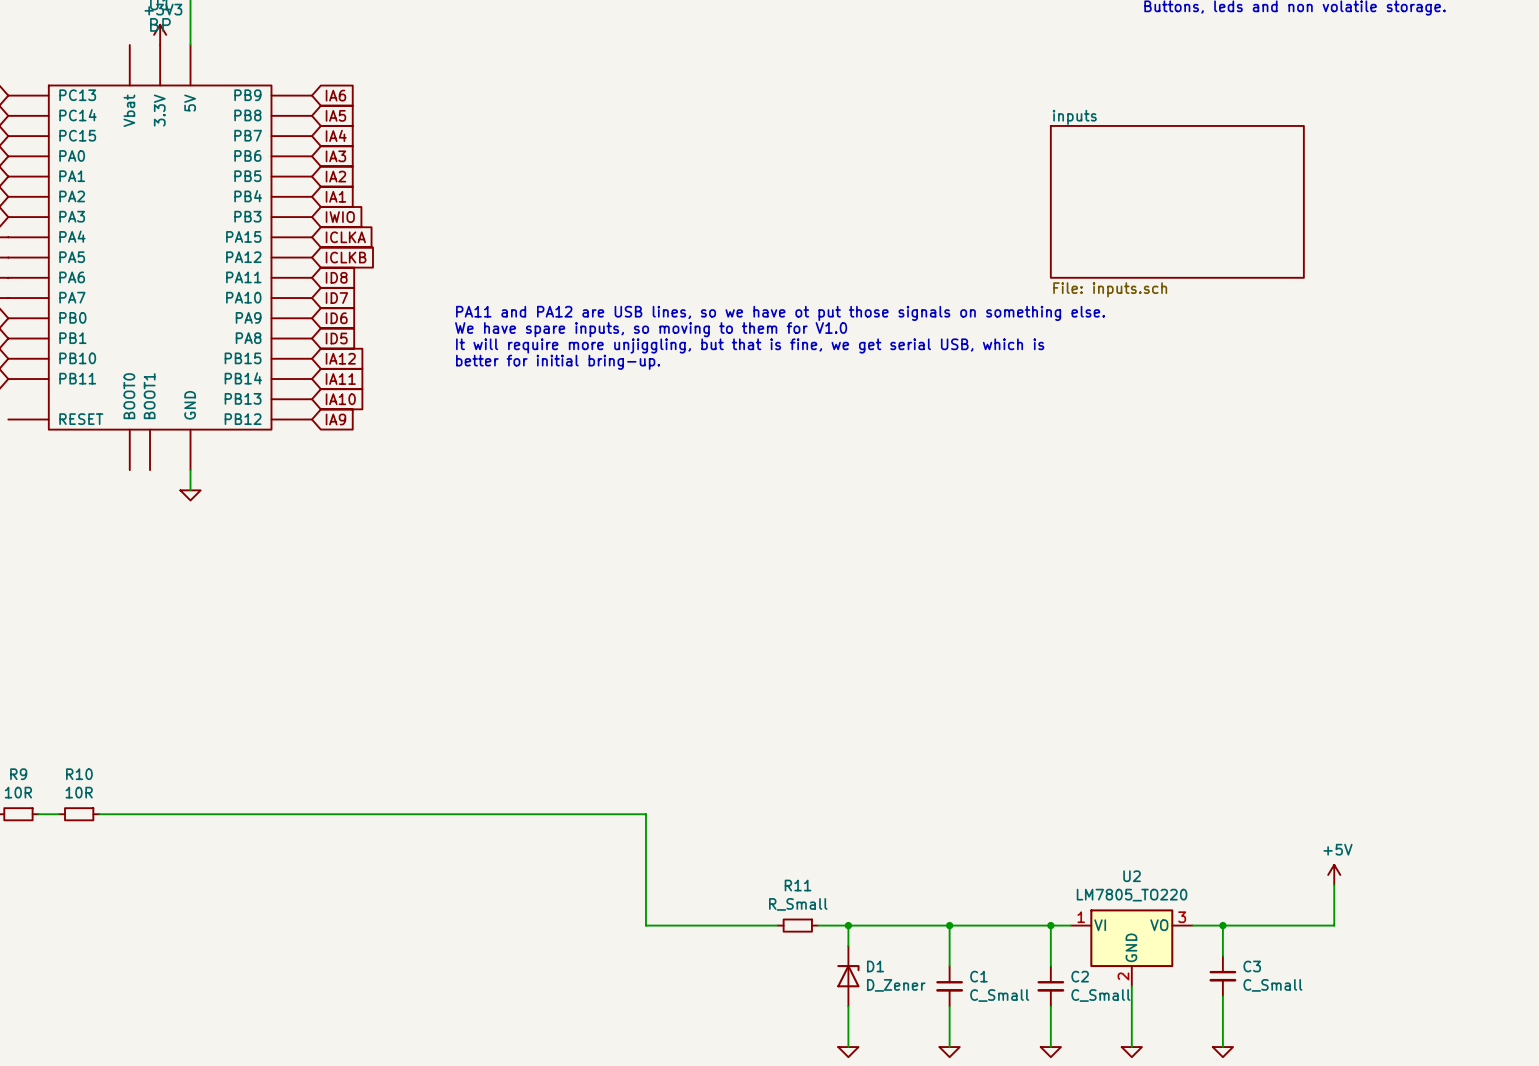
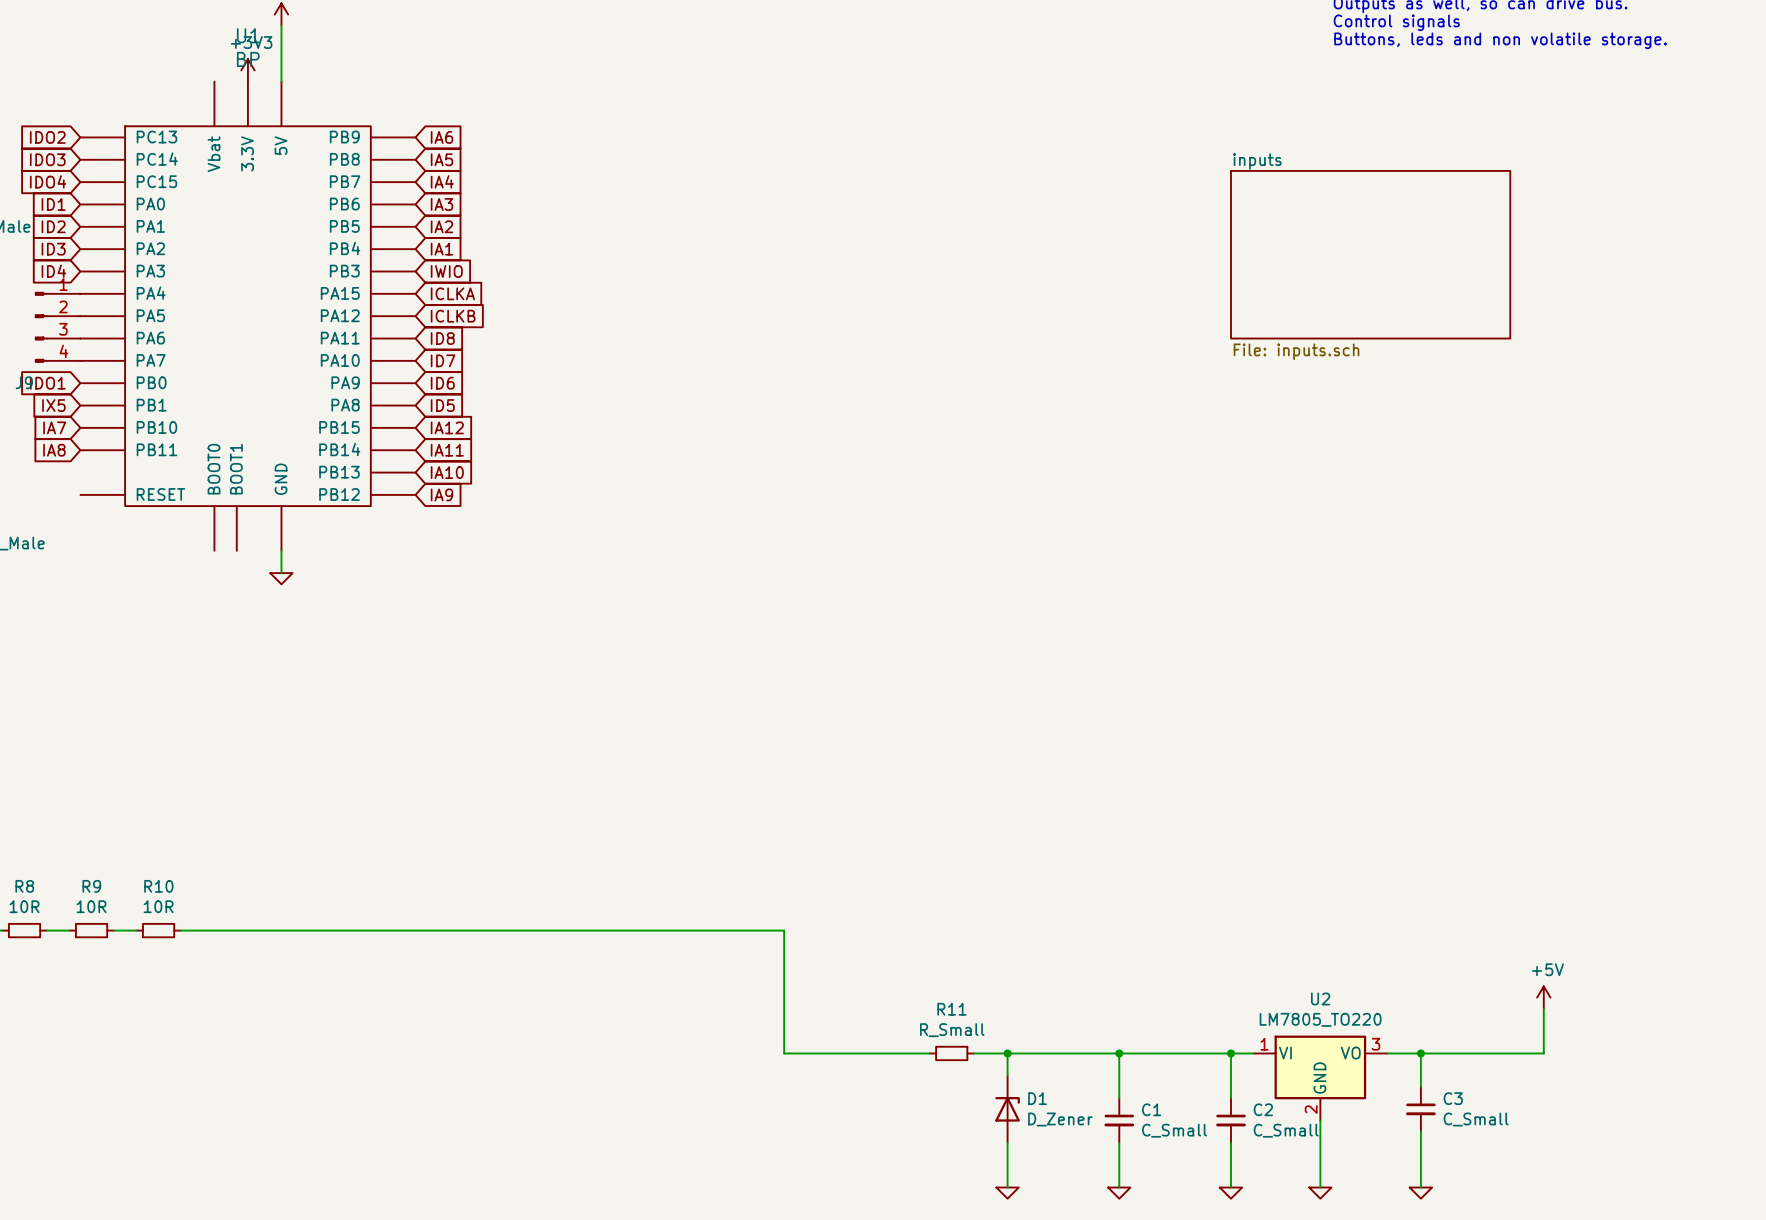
text: PA11 and PA12 are USB lines, so we have ot put those signals on something else. (780, 313) -> none
text: We have spare inputs, so moving to them for V1.0 (651, 329) -> none
text: It will require more unjiggling, but that is fine, we get serial USB, which is (750, 345) -> none
text: better for initial bring-up. (558, 362) -> none

